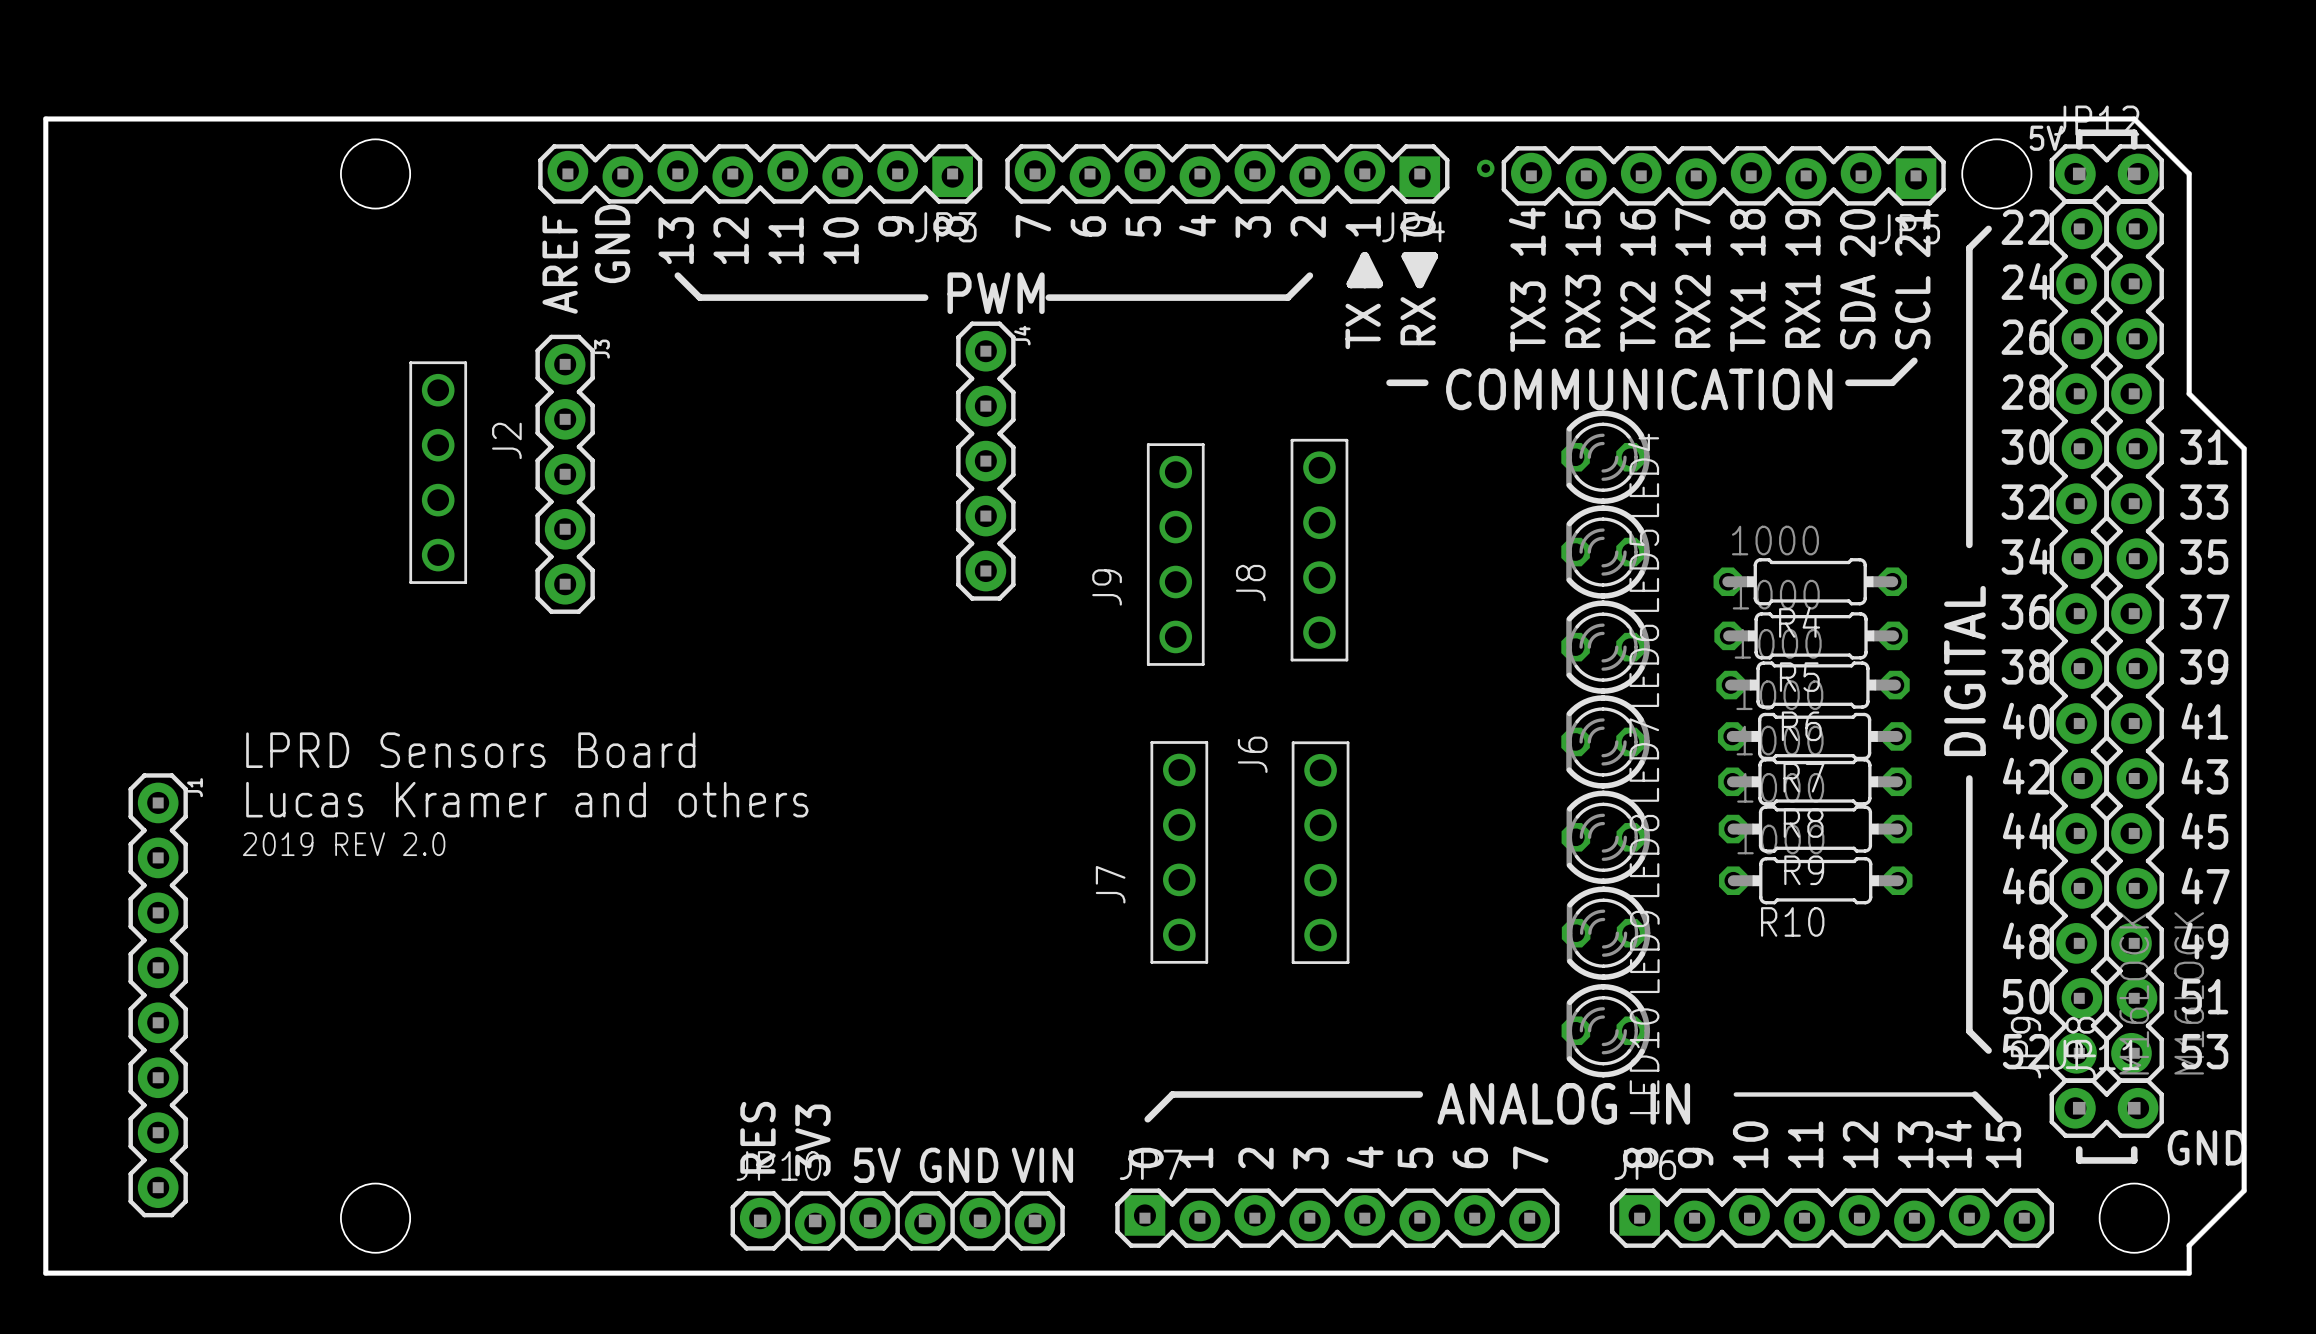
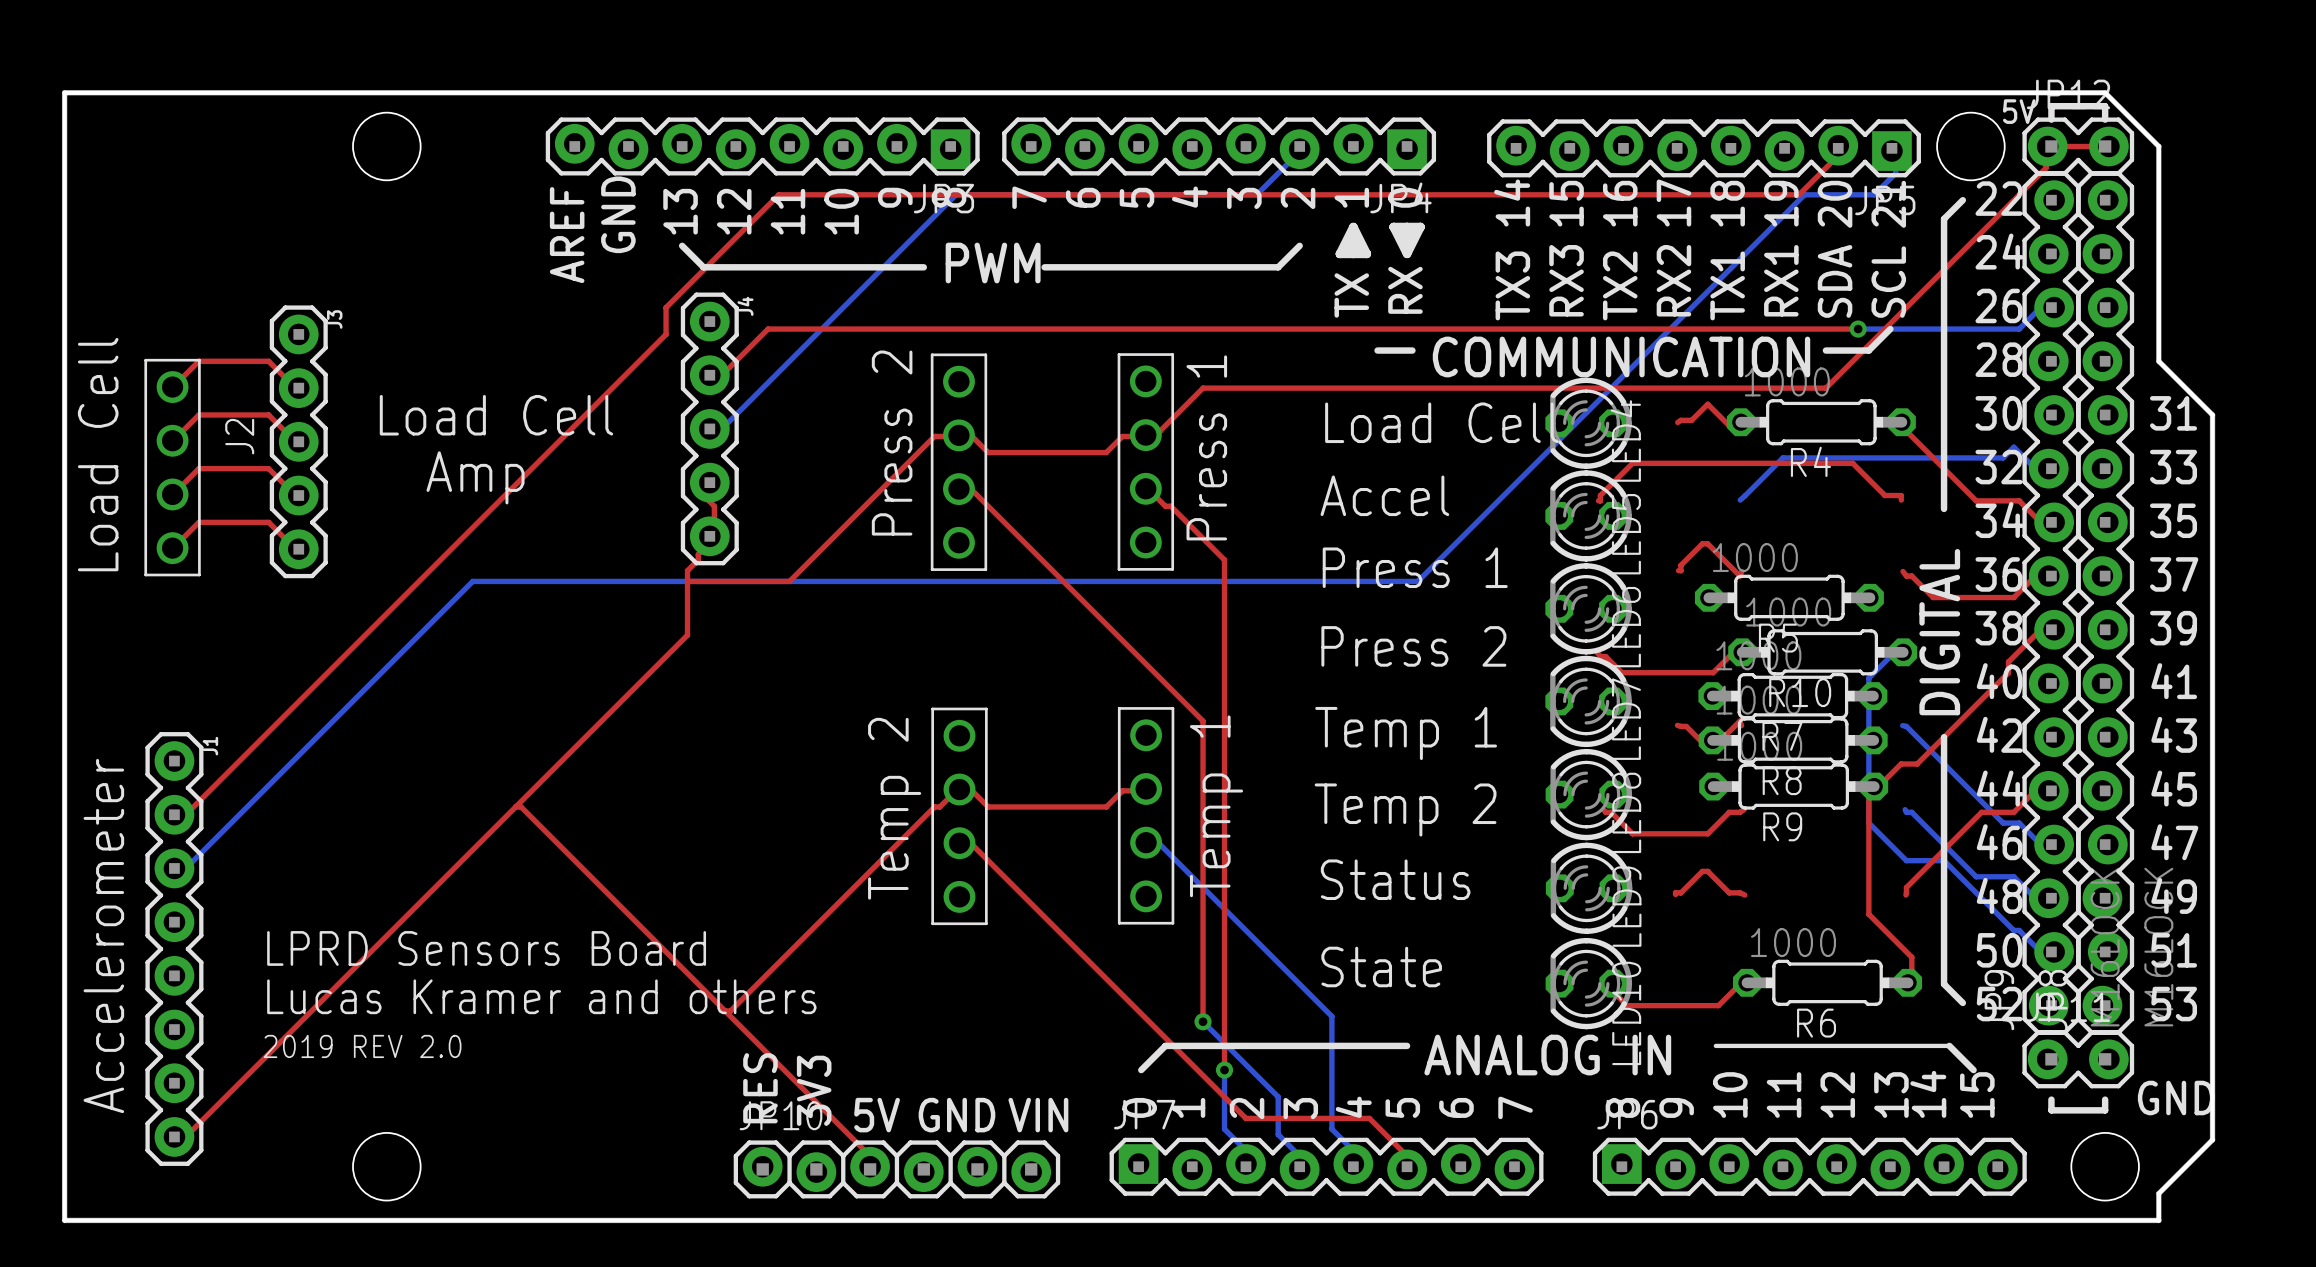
via: (1485, 168) -> none
top track: none -> (1838, 145) (1836, 157) (1799, 194) (778, 194) (666, 307) (666, 334) (188, 812) (177, 812) (174, 814)
top track: none -> (2108, 146) (2046, 146) (2046, 167) (1825, 388) (1203, 388) (1160, 431) (1149, 431) (1143, 436) (1122, 436) (1106, 452) (988, 452) (972, 436) (934, 436) (789, 581) (687, 581)
bottom track: none -> (1299, 149) (1299, 151) (1256, 194) (956, 194) (725, 425) (714, 425) (709, 428)
bottom track: none -> (1891, 151) (1895, 151) (1895, 173) (1874, 194) (1804, 194) (1417, 581) (472, 581) (188, 866) (177, 866) (174, 868)
bottom track: none -> (2054, 307) (2040, 307) (2019, 329) (1858, 329)
top track: none -> (1858, 329) (768, 329) (725, 372) (714, 372) (709, 375)
via: none -> (1858, 329)
top track: none -> (172, 387) (198, 361) (268, 361) (295, 388) (298, 388)
text: none -> Load Cell (496, 415)
text: none -> Load Cell (1441, 422)
top track: none -> (1740, 422) (1740, 425) (1729, 425) (1707, 404) (1691, 420) (1680, 420) (1677, 422)
top track: none -> (1901, 422) (1906, 425) (1906, 431) (1976, 500) (2019, 500) (2040, 522) (2054, 522)
J4 position: (985, 461) -> (709, 428)
J2 position: (438, 472) -> (172, 467)
J3 position: (565, 474) -> (298, 441)
top track: none -> (172, 440) (198, 414) (268, 414) (295, 441) (298, 441)
text: none -> Press 2 (892, 443)
text: none -> Press 1 (1206, 447)
text: none -> Load Cell (98, 454)
part: none -> (1145, 461)
part: none -> (958, 462)
bottom track: none -> (2048, 468) (2035, 468) (2013, 447) (2003, 457) (1782, 457) (1740, 500)
text: none -> Amp (475, 477)
top track: none -> (709, 482) (709, 500) (714, 506) (714, 533) (709, 536) (714, 538) (698, 554) (698, 559) (687, 570) (687, 635) (188, 1134) (177, 1134) (174, 1136)
top track: none -> (958, 489) (972, 490) (1203, 721) (1203, 1021)
top track: none -> (1145, 488) (1165, 506) (1170, 506) (1224, 559) (1224, 1070)
top track: none -> (172, 494) (198, 468) (268, 468) (295, 495) (298, 495)
text: none -> Accel (1384, 495)
top track: none -> (1901, 500) (1901, 495) (1884, 495) (1852, 463) (1632, 463) (1600, 495) (1600, 500) (1598, 500)
J8: (1319, 550) -> none
J9: (1175, 554) -> none
R4 position: (1810, 581) -> (1821, 422)
top track: none -> (172, 548) (198, 522) (268, 522) (295, 549) (298, 549)
text: none -> Press 1 (1415, 567)
top track: none -> (1678, 570) (1680, 570) (1680, 565) (1702, 543) (1707, 543) (1740, 576) (1741, 571)
top track: none -> (1902, 571) (1906, 576) (1911, 576) (1933, 597) (2013, 597) (2035, 576) (2048, 576)
top track: none -> (2054, 629) (2040, 629) (2008, 661) (2008, 672) (1917, 764) (1901, 764) (1868, 796) (1868, 914) (1911, 957) (1911, 978) (1908, 982)
text: none -> Press 2 (1413, 646)
R6 position: (1813, 685) -> (1827, 982)
top track: none -> (1596, 652) (1600, 656) (1605, 656) (1621, 672) (1713, 672) (1729, 656) (1740, 656) (1742, 652)
bottom track: none -> (1903, 652) (1901, 656) (1890, 656) (1868, 678) (1868, 823) (1906, 860) (1944, 860) (2013, 930) (2019, 930) (2040, 951) (2054, 951)
text position: LPRD Sensors Board (470, 750) -> LPRD Sensors Board (486, 948)
top track: none -> (1677, 725) (1686, 726) (1707, 747) (1713, 747) (1740, 721) (1741, 725)
bottom track: none -> (1902, 725) (1906, 726) (2003, 823) (2019, 823) (2040, 844) (2054, 844)
text: none -> Temp 1 (1406, 733)
text position: Lucas Kramer and others (527, 799) -> Lucas Kramer and others (541, 996)
top track: none -> (1146, 788) (1143, 790) (1122, 790) (1106, 806) (988, 806) (972, 790) (956, 790) (939, 806) (934, 806) (730, 1011) (725, 1011)
top track: none -> (2048, 790) (2035, 790) (2013, 812) (1981, 812) (1906, 887) (1905, 895)
text position: 2019 REV 2.0 (344, 844) -> 2019 REV 2.0 (362, 1046)
top track: none -> (515, 806) (521, 806) (870, 1156) (870, 1166)
text: none -> Temp 1 (1216, 806)
text: none -> Temp 2 (894, 808)
J7: (1179, 852) -> none
J6: (1320, 852) -> none
top track: none -> (1744, 809) (1740, 812) (1729, 812) (1707, 833) (1632, 833) (1611, 812) (1605, 812) (1603, 809)
bottom track: none -> (1905, 809) (1906, 812) (1911, 812) (1976, 876) (2013, 876) (2035, 898) (2048, 898)
text: none -> Temp 2 (1405, 810)
part: none -> (959, 816)
part: none -> (1146, 815)
R10 position: (1815, 880) -> (1822, 652)
bottom track: none -> (1146, 842) (1160, 844) (1331, 1016) (1331, 1129) (1353, 1150) (1353, 1164)
top track: none -> (959, 843) (972, 844) (1245, 1118) (1369, 1118) (1407, 1156) (1407, 1169)
text: none -> Status (1395, 879)
top track: none -> (1675, 894) (1675, 892) (1680, 892) (1702, 871) (1707, 871) (1729, 892) (1744, 895)
text: none -> Accelerometer (103, 936)
text: none -> State (1381, 966)
top track: none -> (1606, 982) (1611, 984) (1611, 989) (1627, 1005) (1718, 1005) (1745, 978) (1746, 982)
bottom track: none -> (1203, 1021) (1278, 1096) (1278, 1134) (1299, 1156) (1299, 1169)
via: none -> (1203, 1021)
bottom track: none -> (1224, 1070) (1224, 1129) (1245, 1150) (1245, 1164)
via: none -> (1224, 1070)

